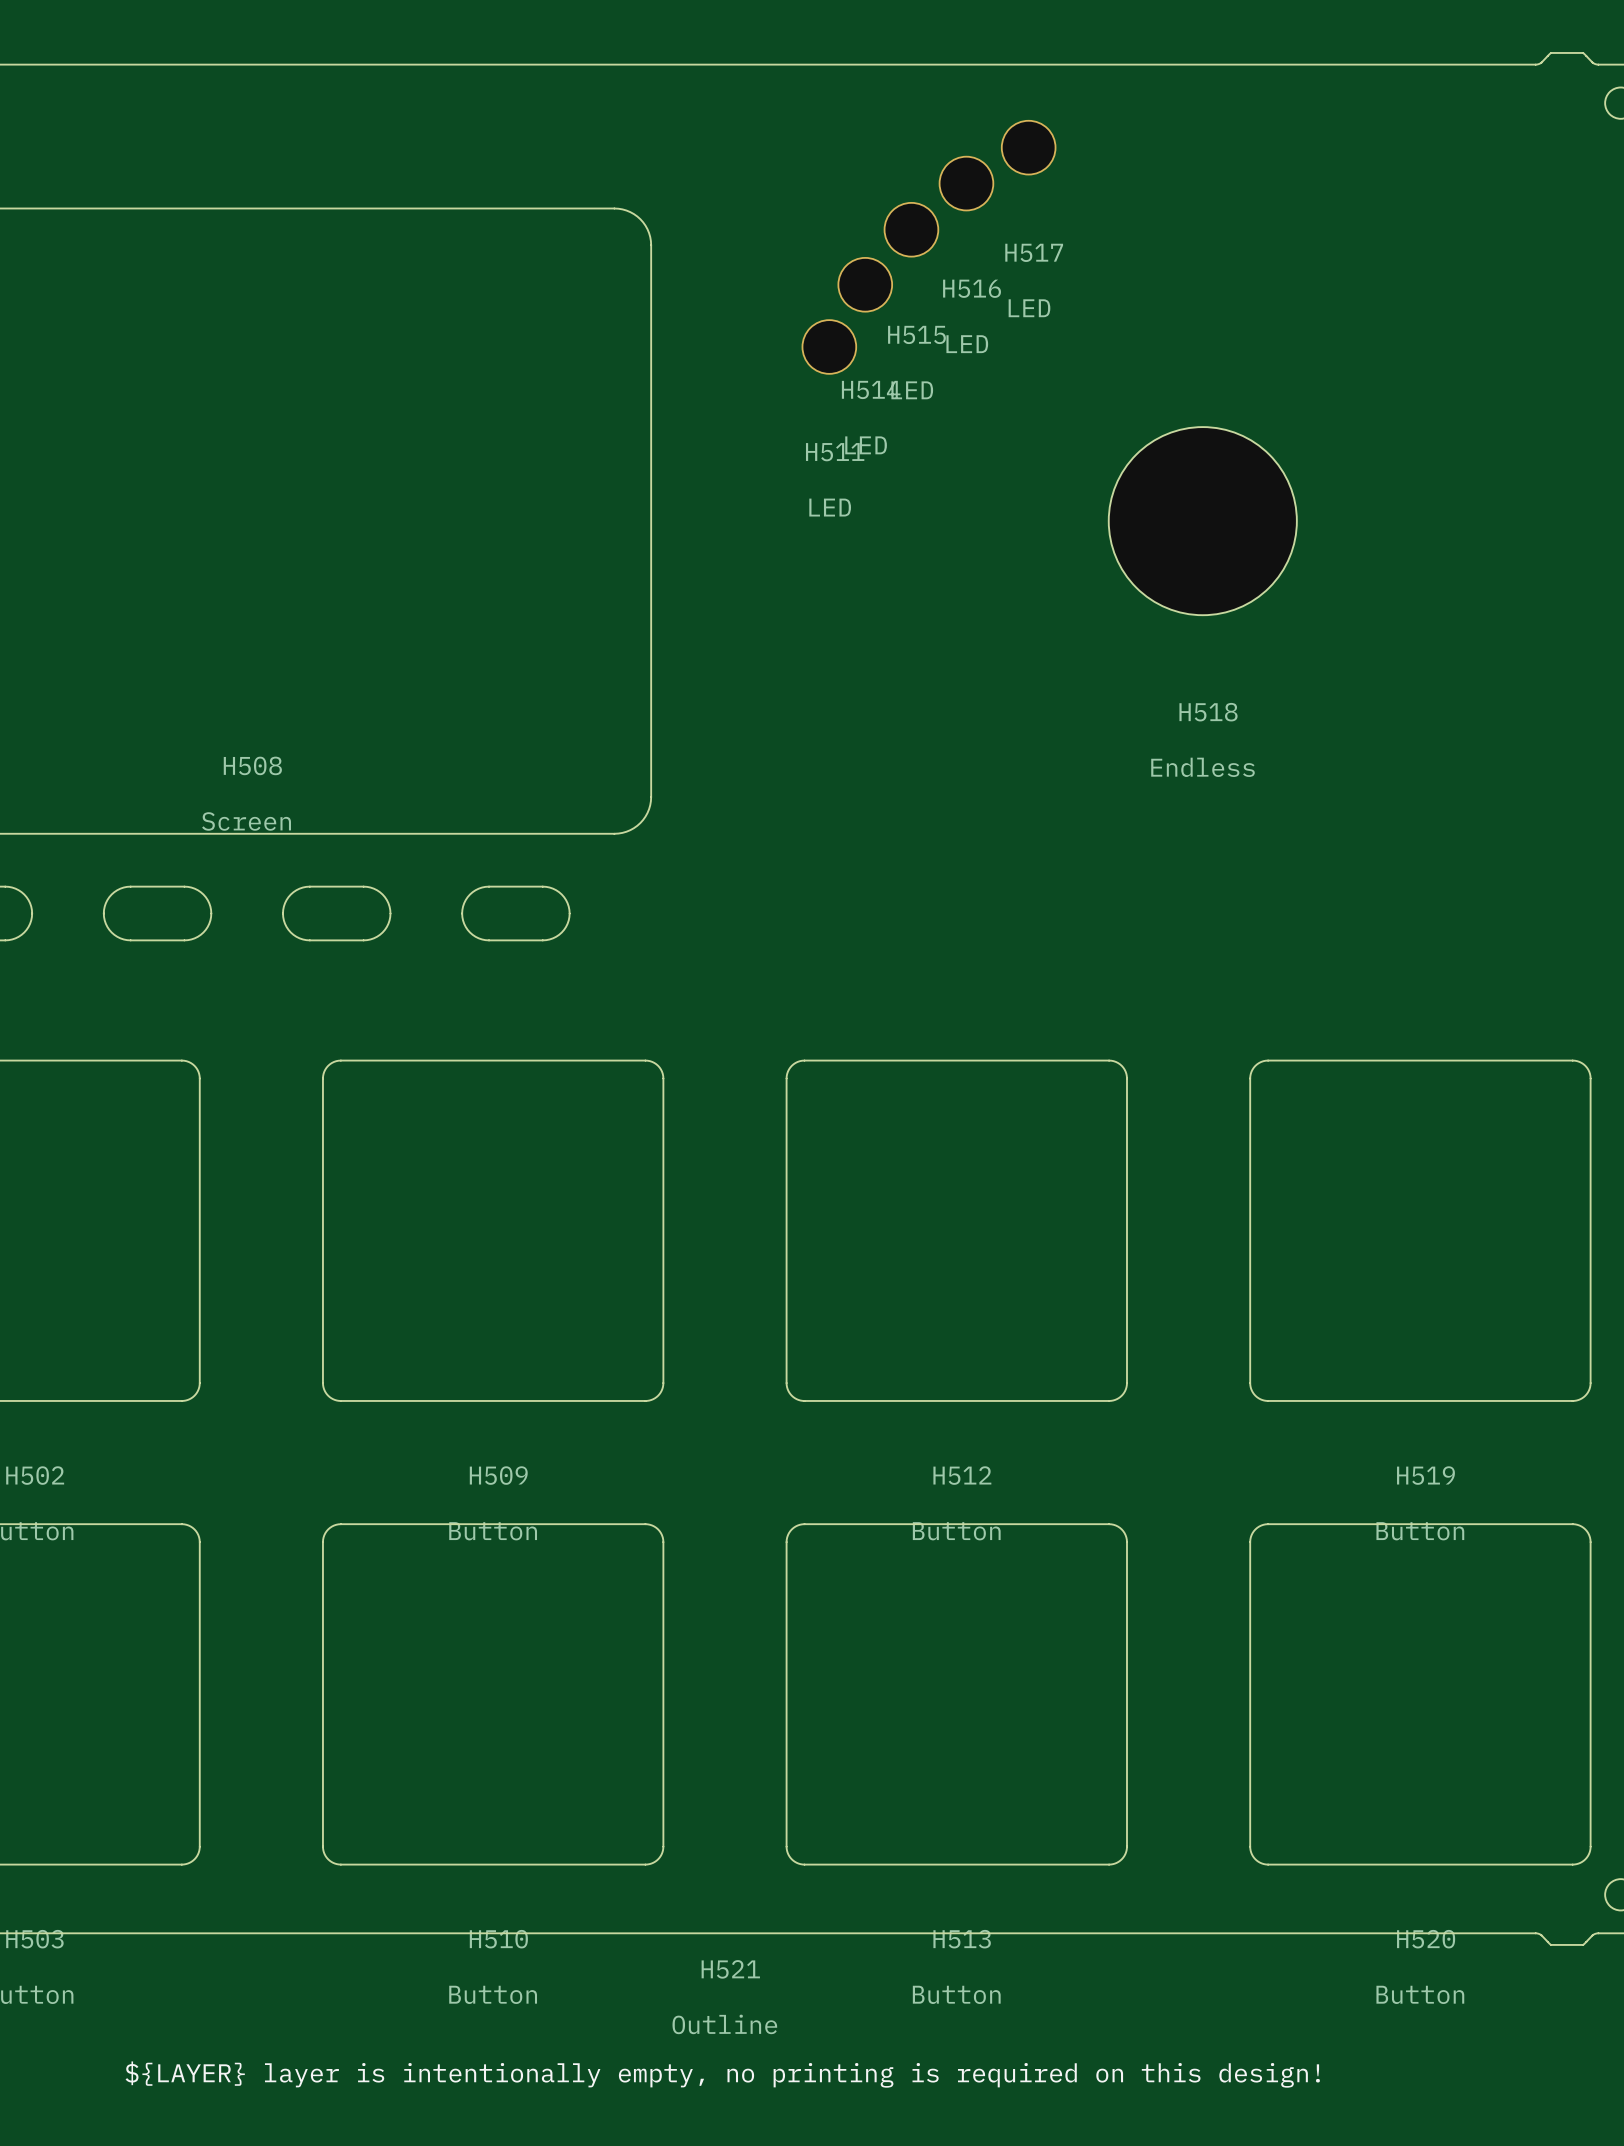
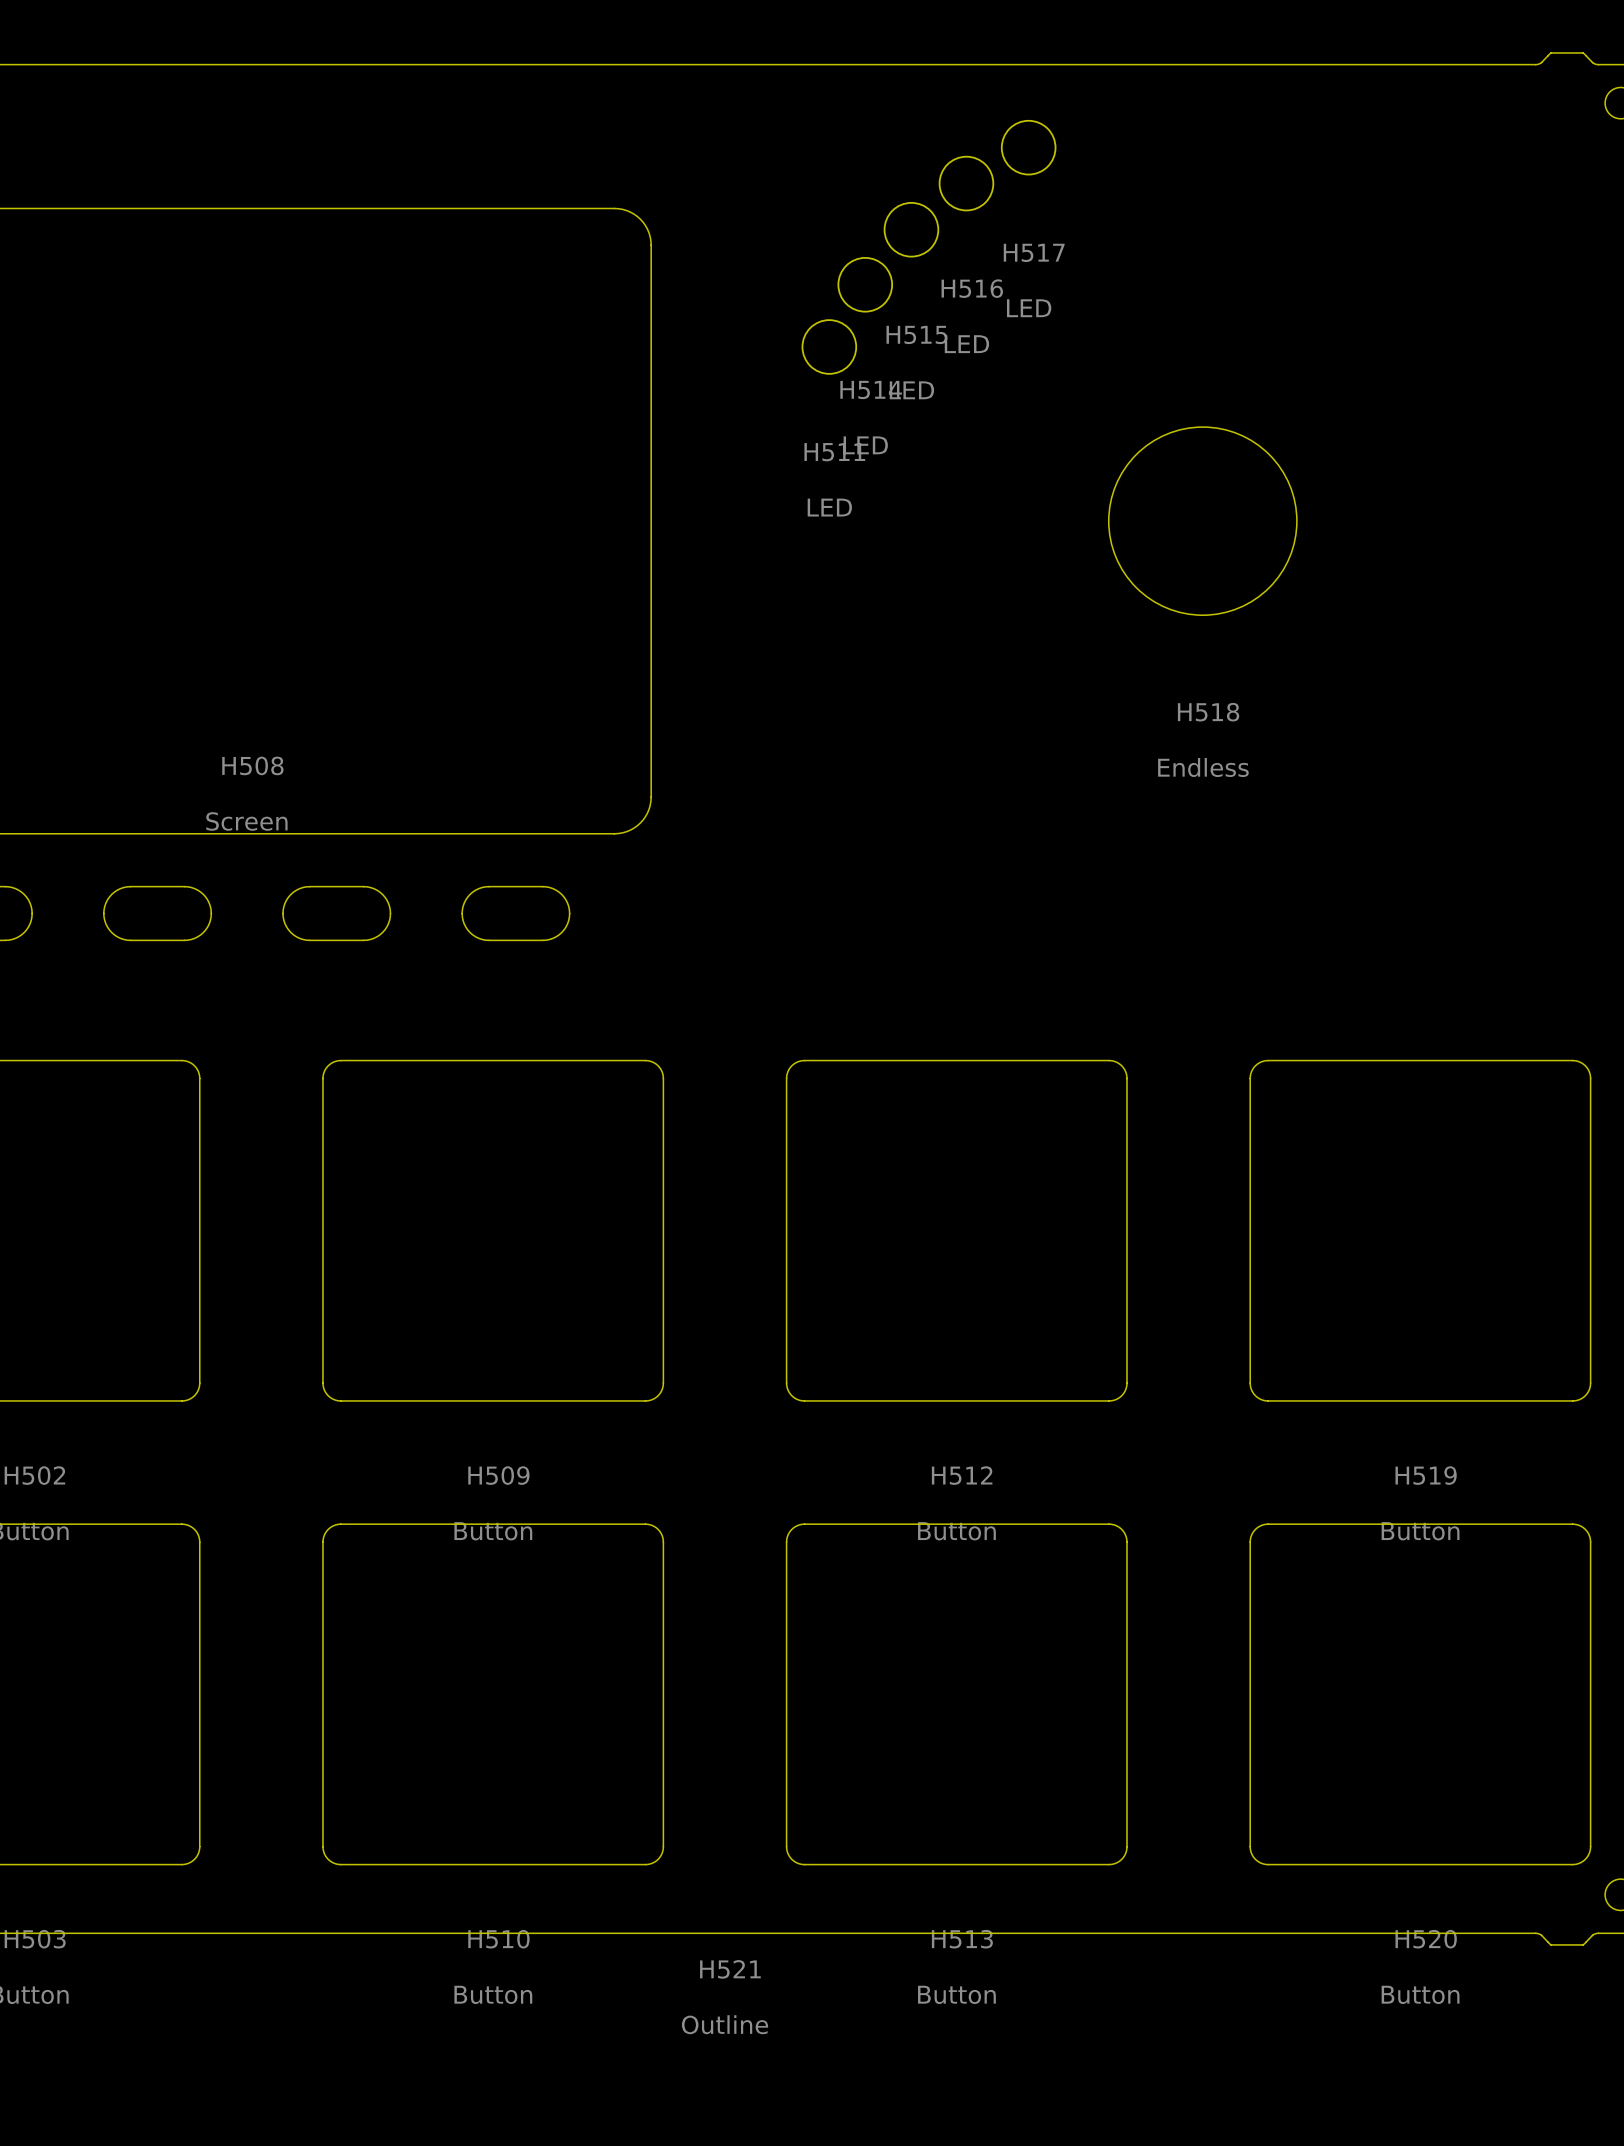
text: ${LAYER} layer is intentionally empty, no printing is required on this design! (722, 2074) -> none

